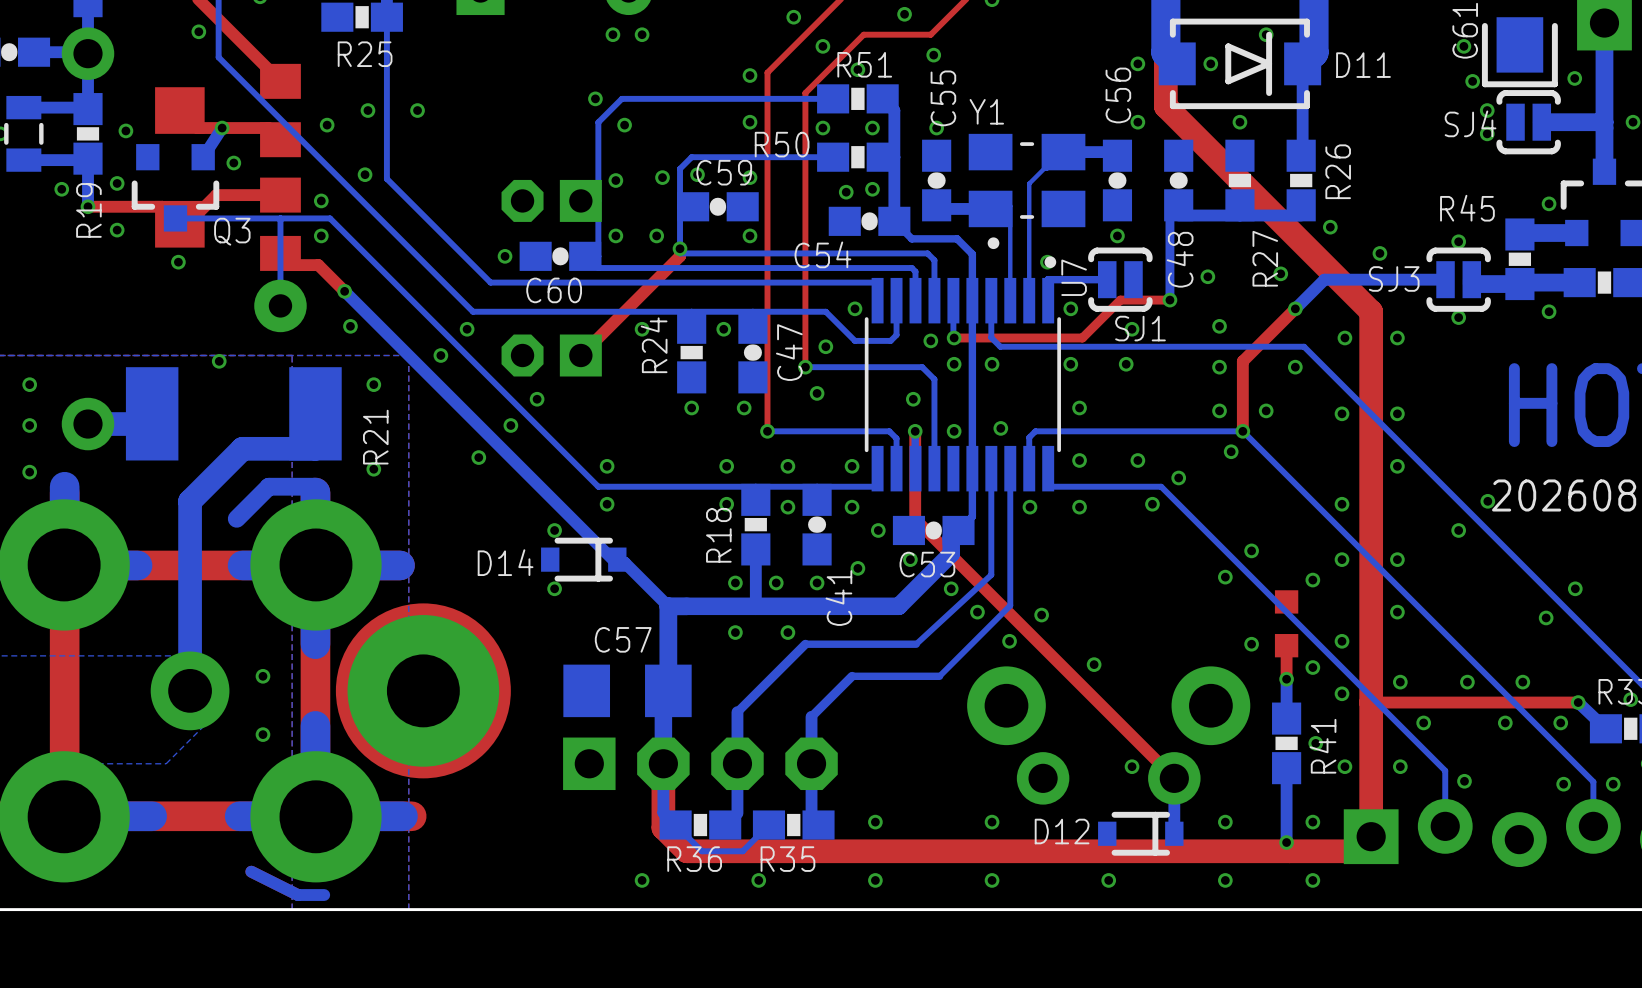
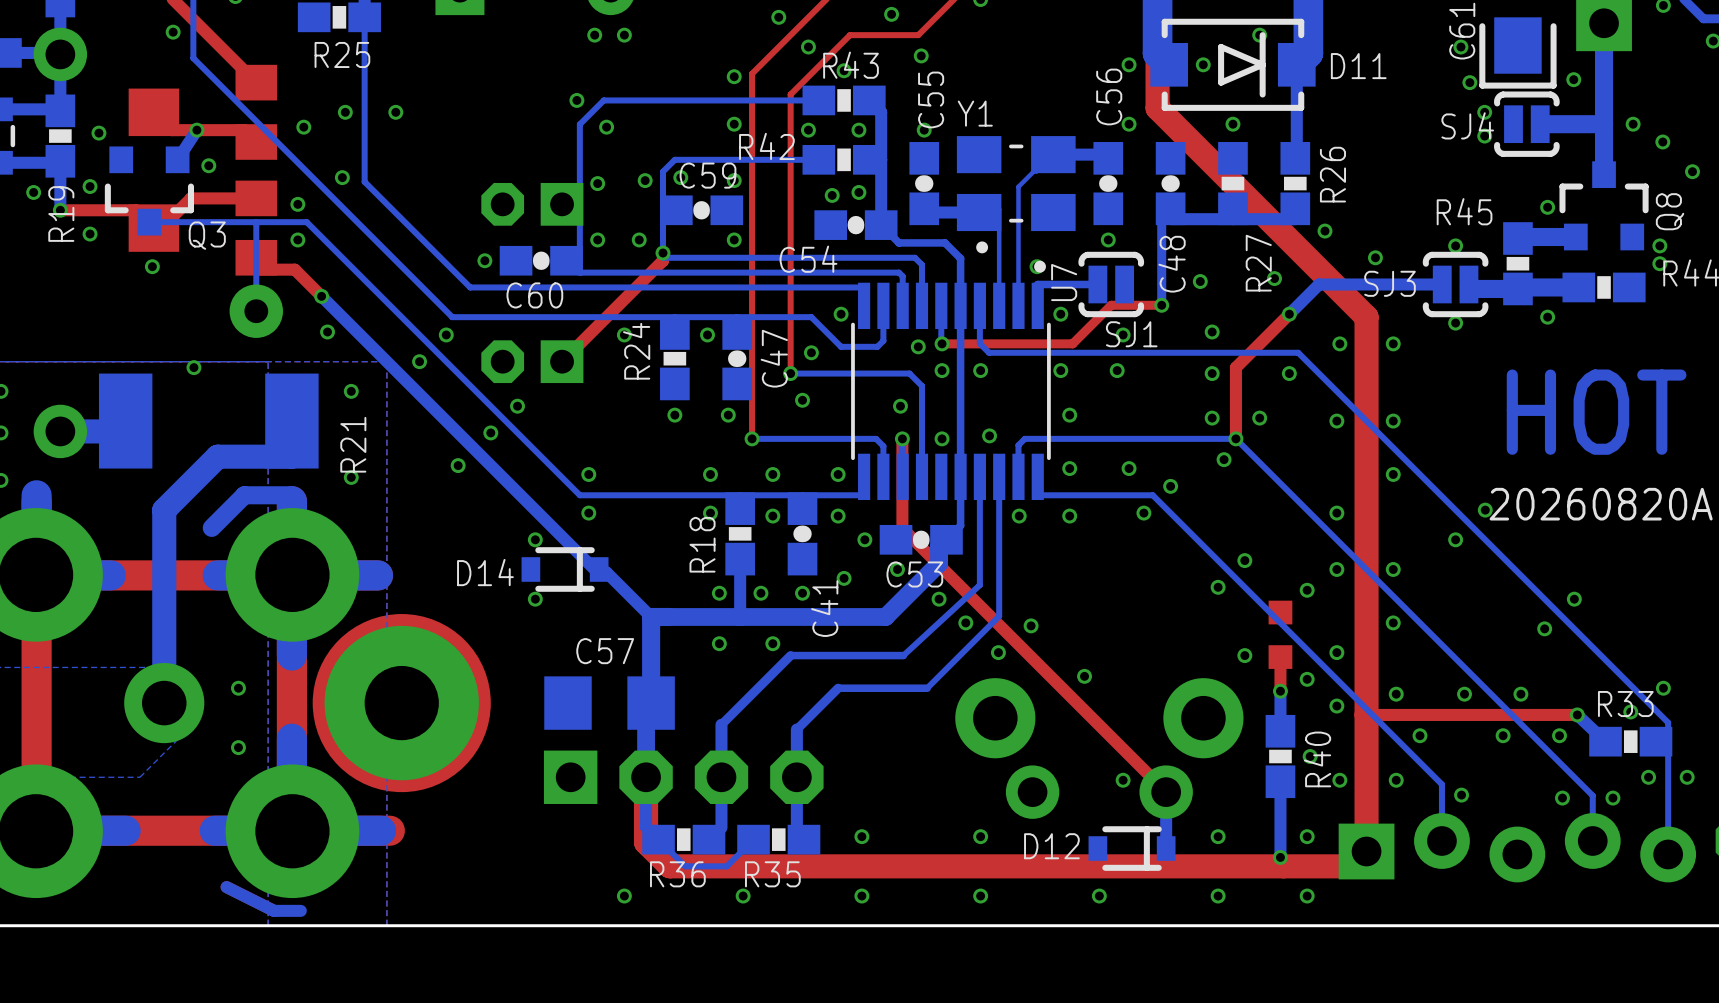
R51 name: R51 (864, 64) -> R43 (851, 65)
R50 name: R50 (782, 144) -> R42 (766, 146)
R41 name: R41 (1323, 746) -> R40 (1317, 759)

